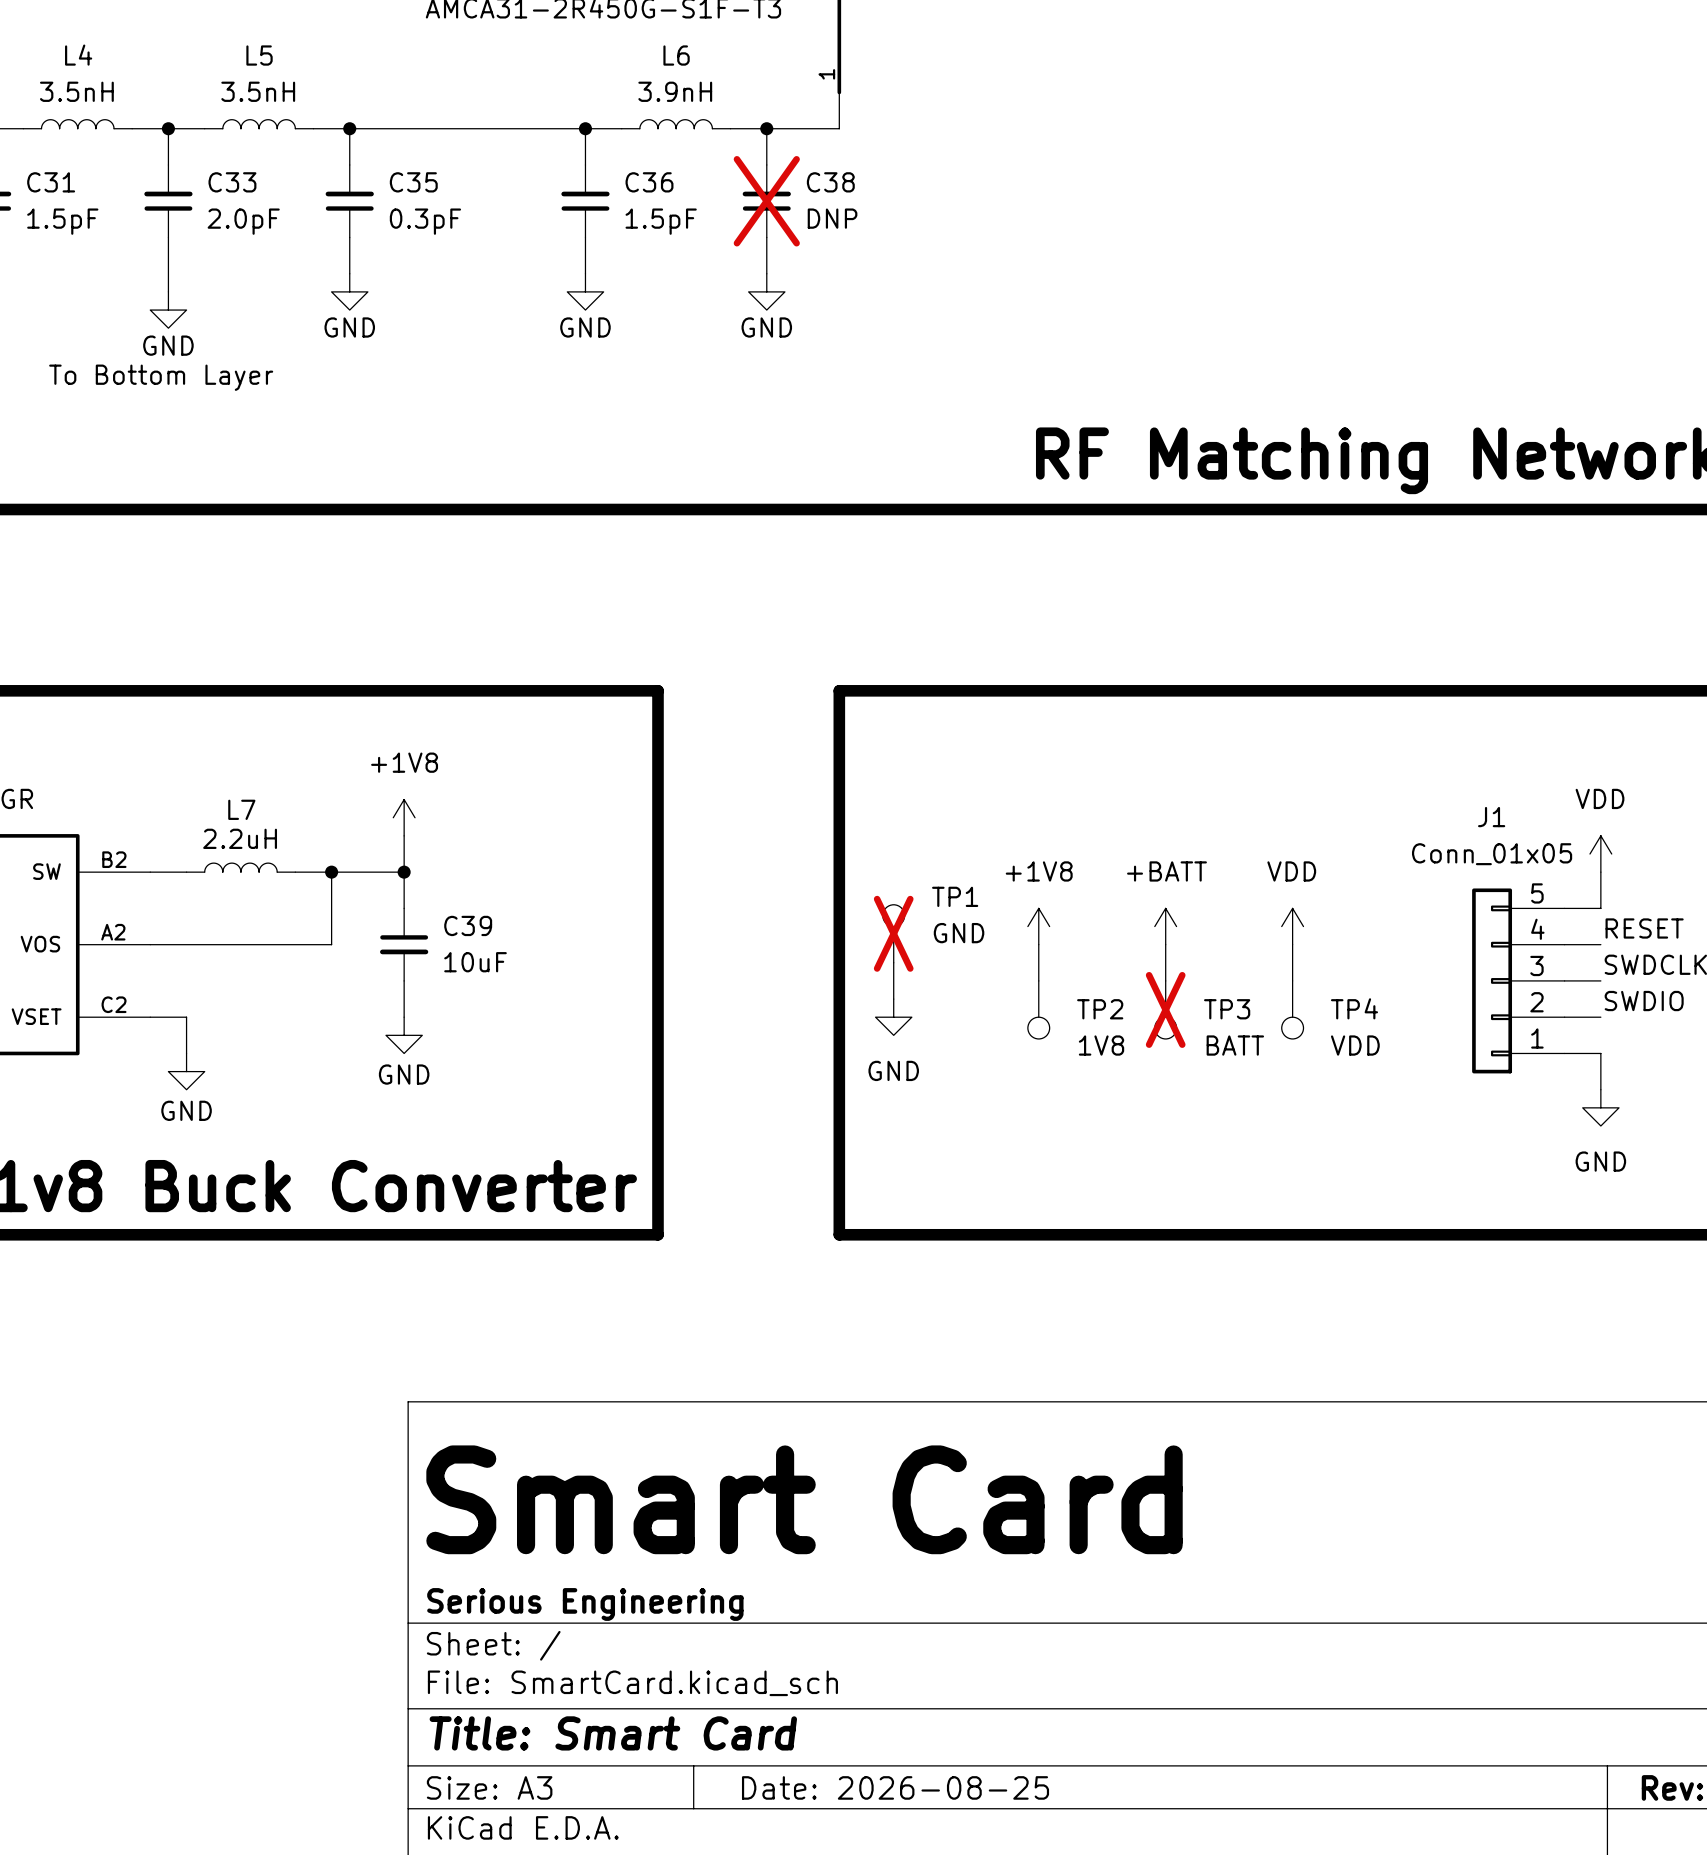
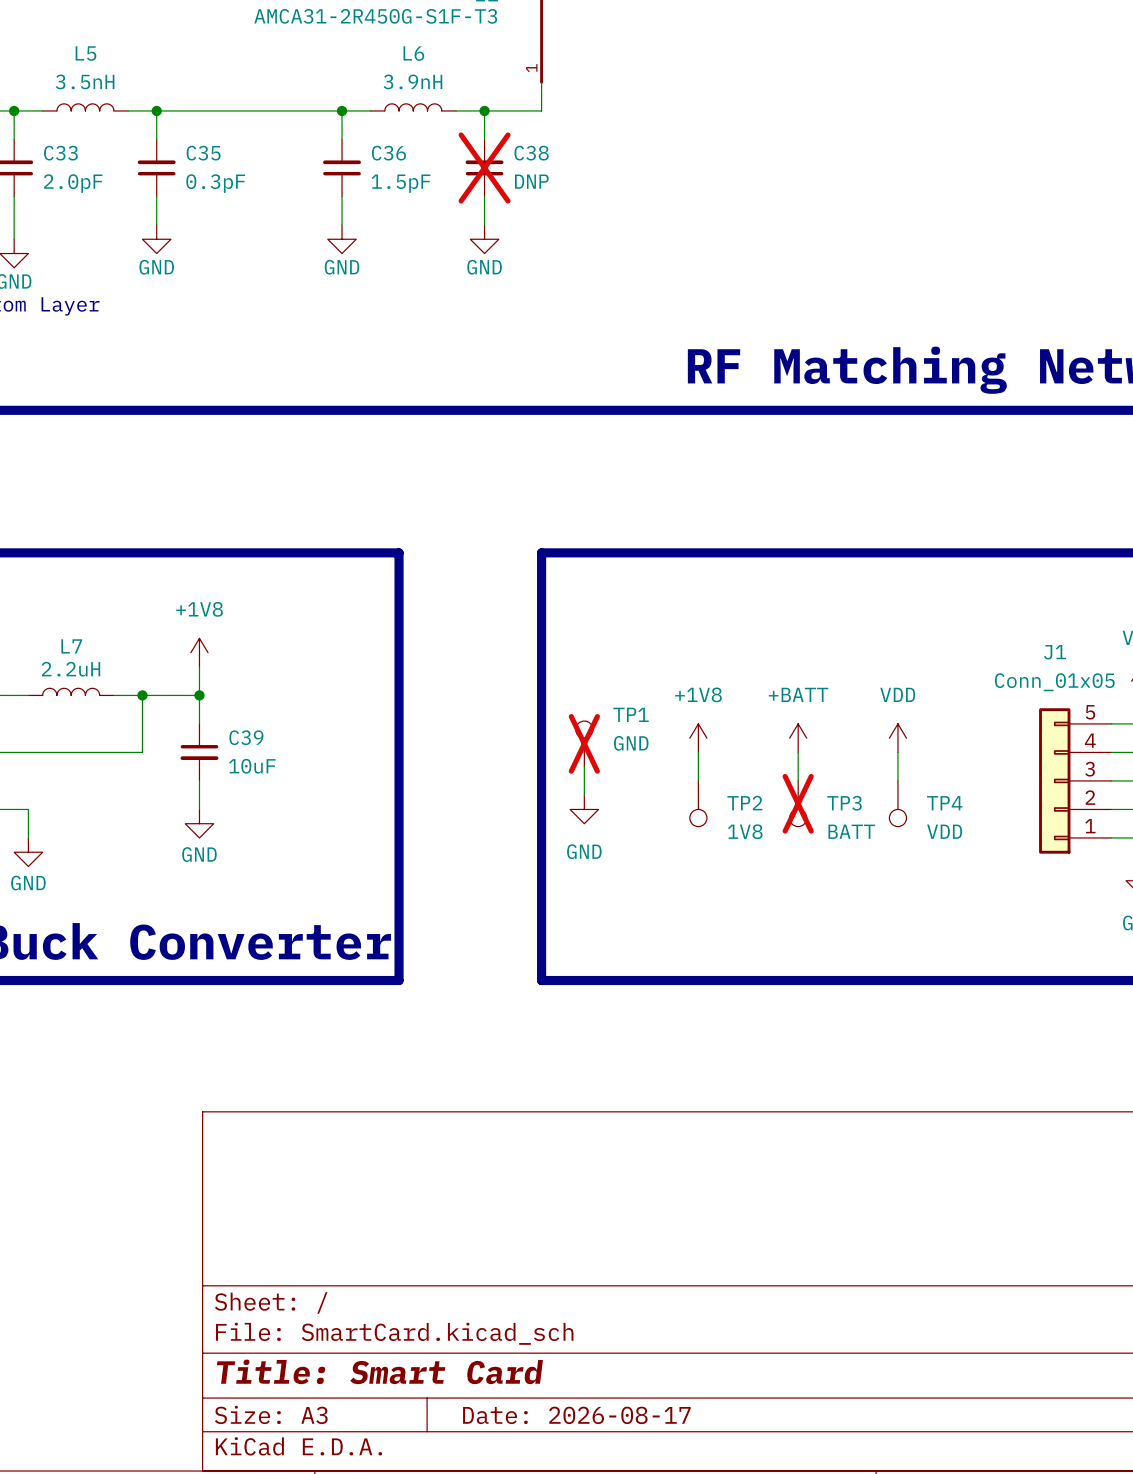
text: Smart Card (804, 1499) -> none
title block: Serious Engineering (585, 1604) -> none
title block: Date: 2026-08-25 (895, 1787) -> Date: 2026-08-17 (576, 1415)

